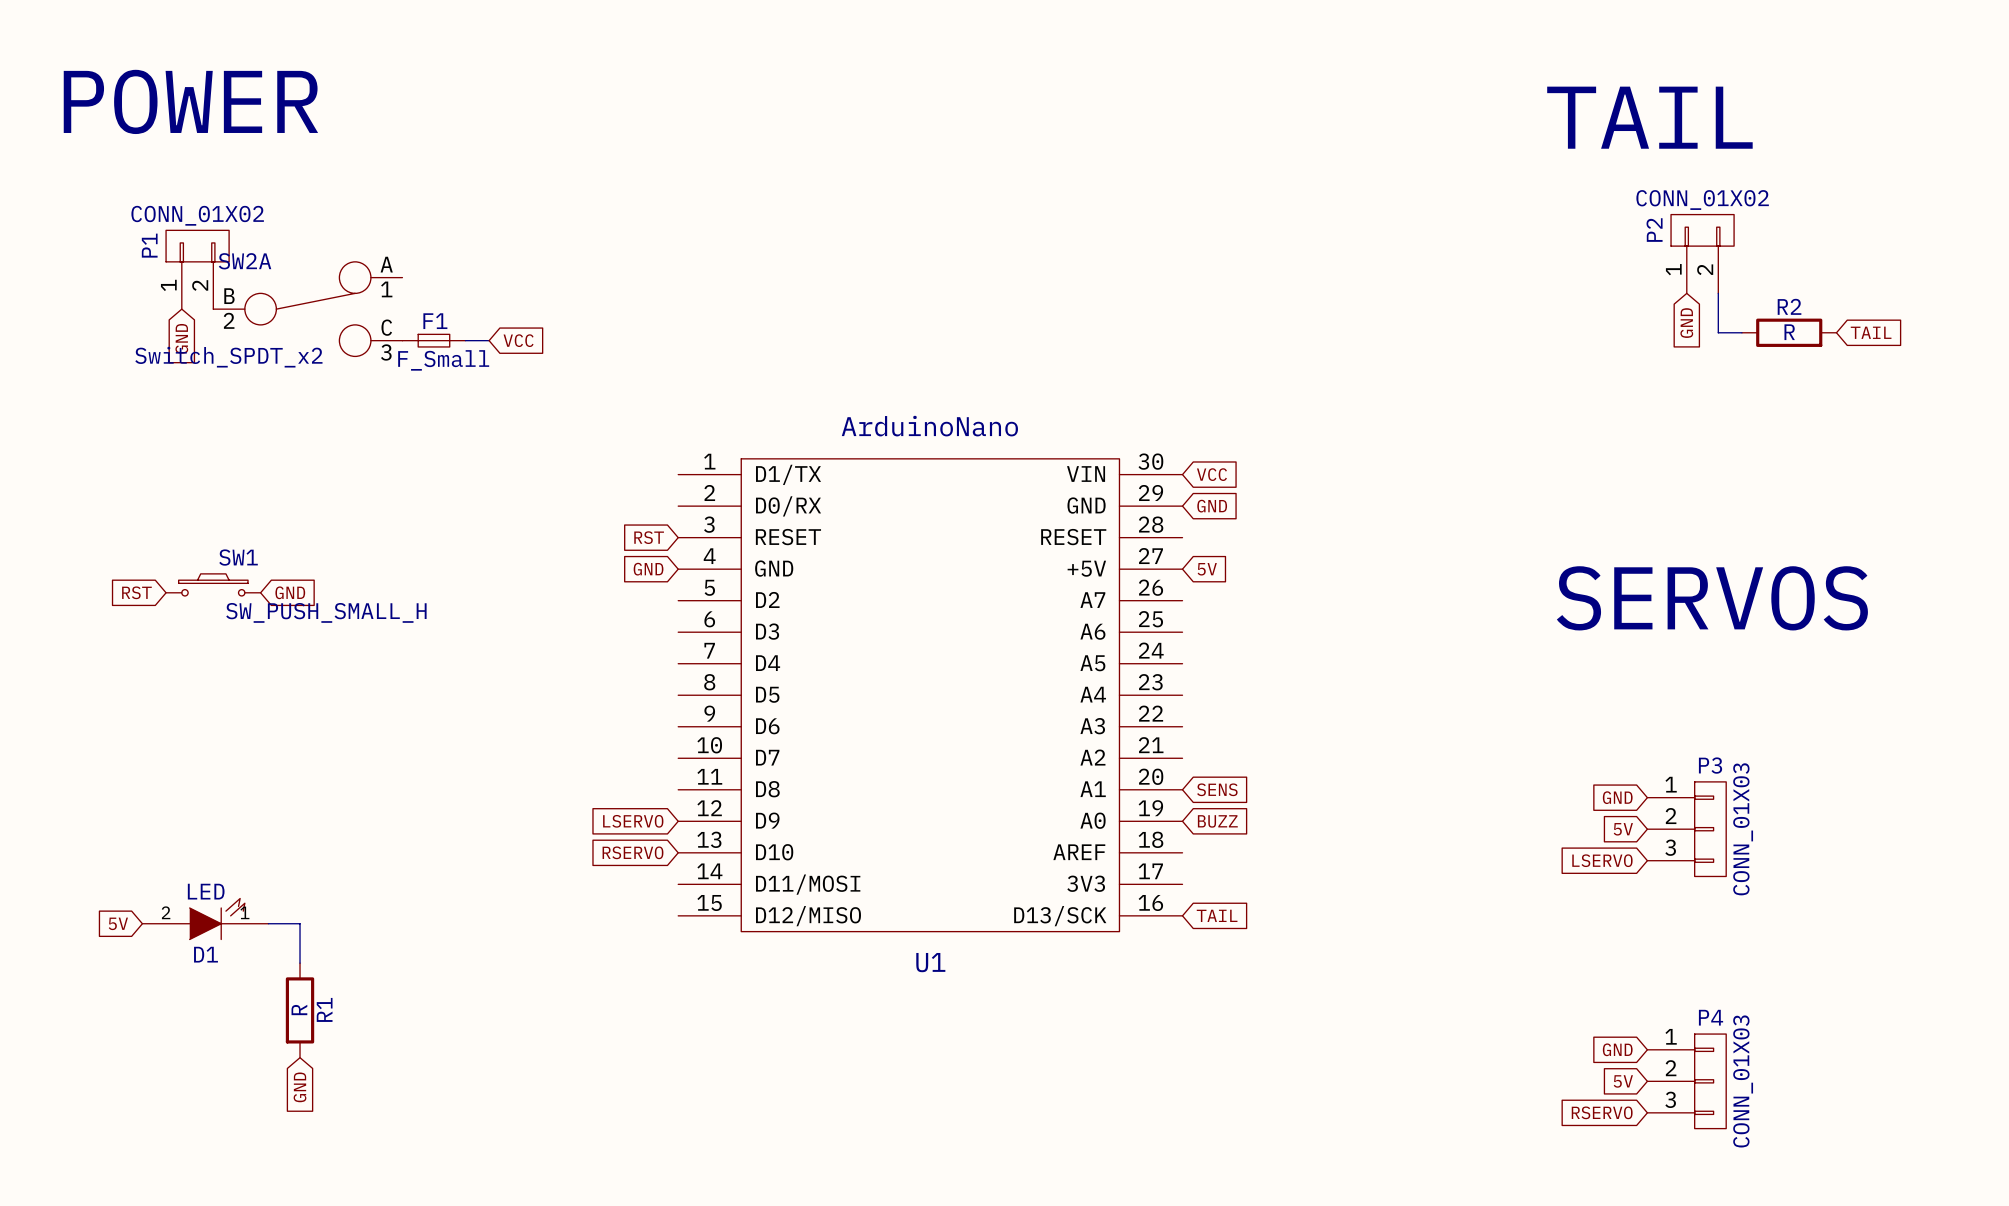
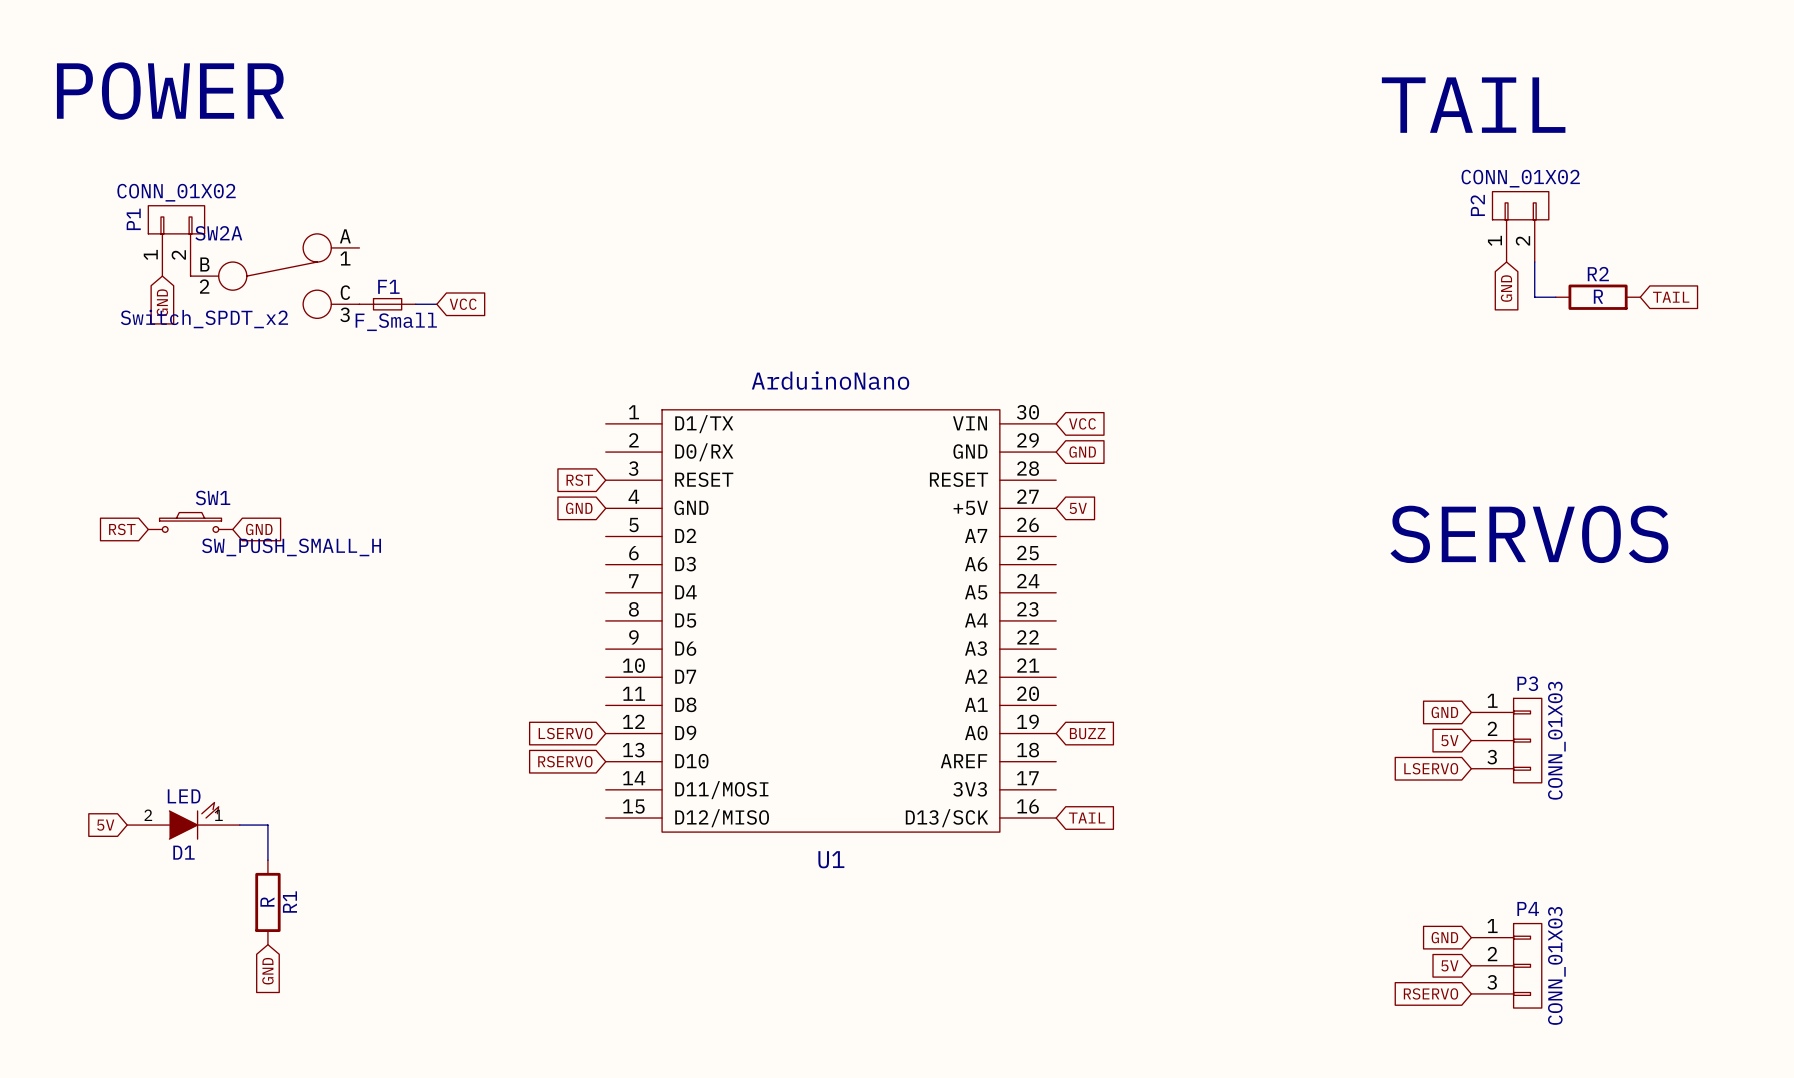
global label: SENS (1217, 789) -> none

